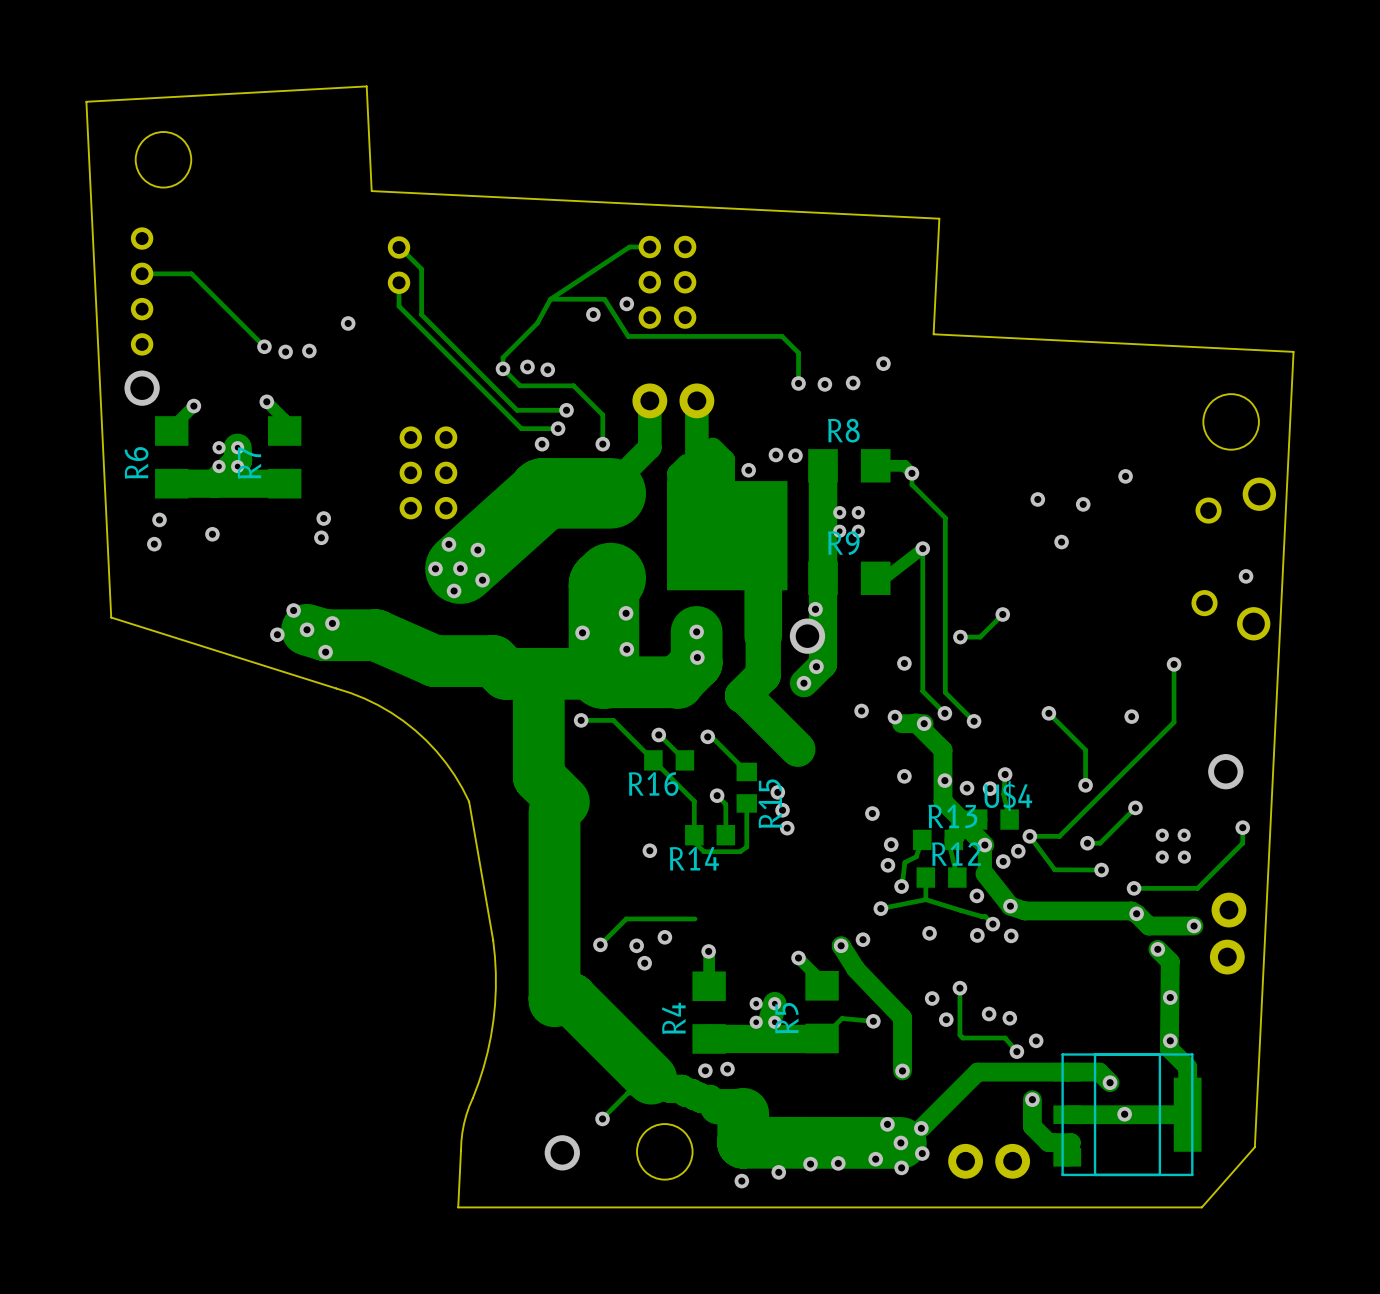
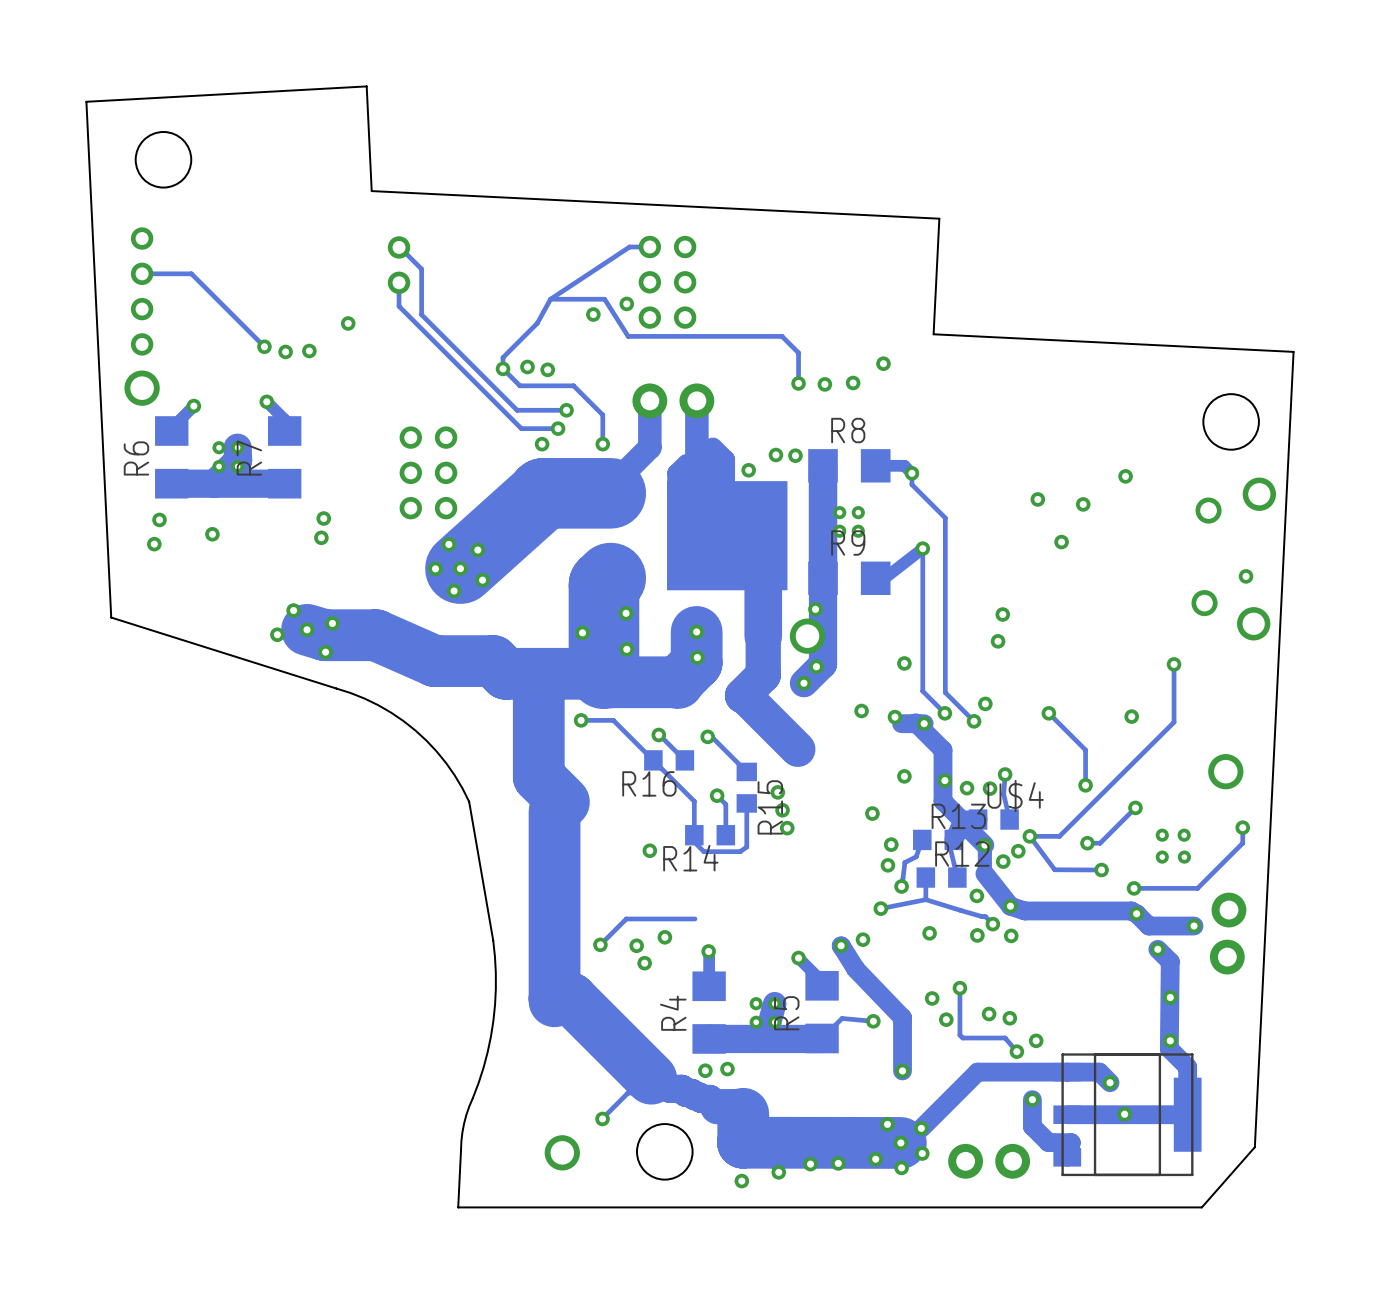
track: (1002, 614) (980, 637) (960, 637) -> none
via: (960, 637) -> none
via: none -> (998, 641)
via: none -> (985, 703)

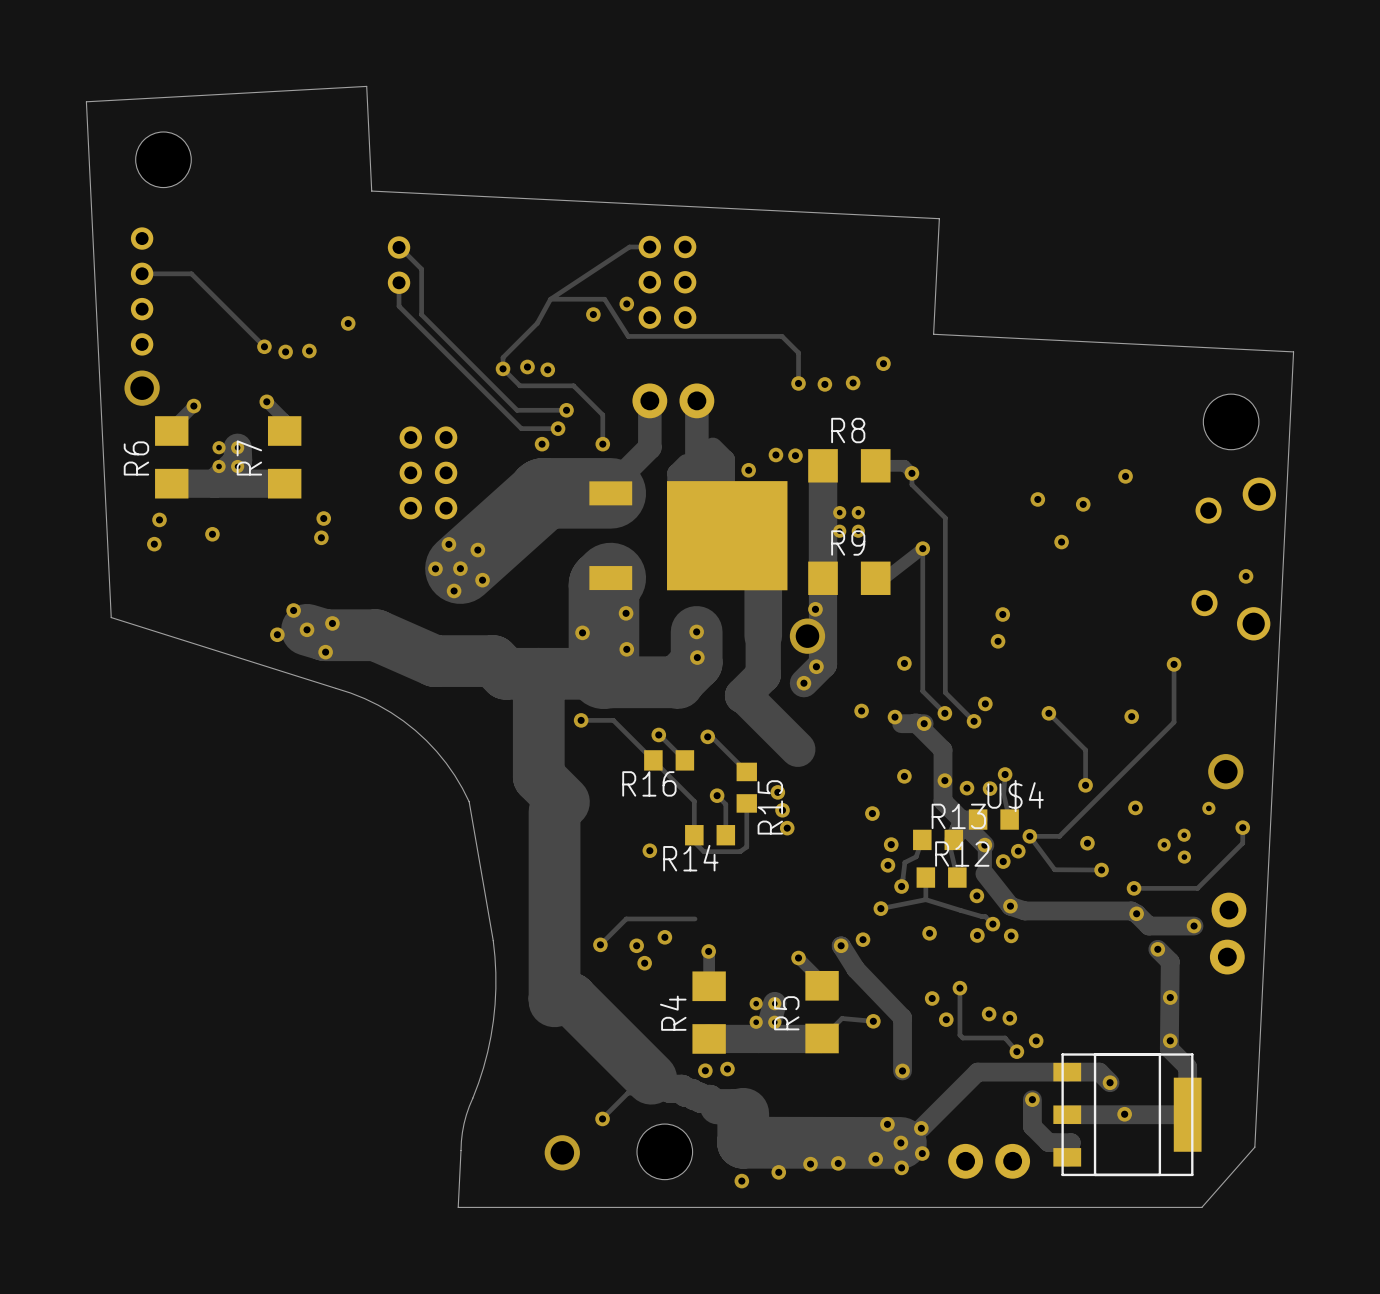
track: (1135, 807) (1100, 843) (1087, 843) -> none
via: none -> (1208, 808)
via: (1162, 835) -> none
via: none -> (1164, 844)
via: (1162, 857) -> none

